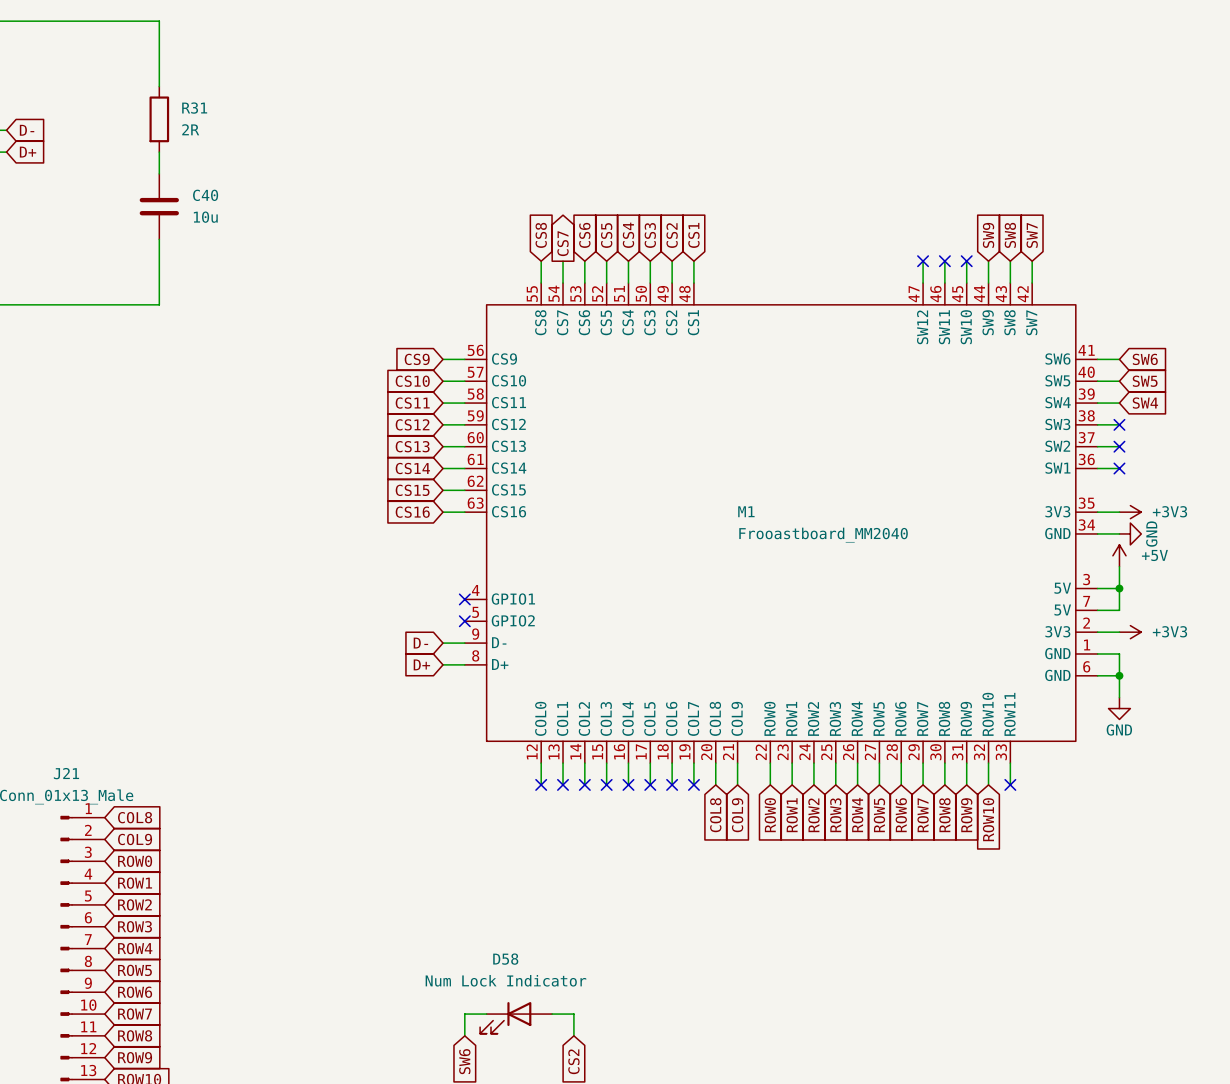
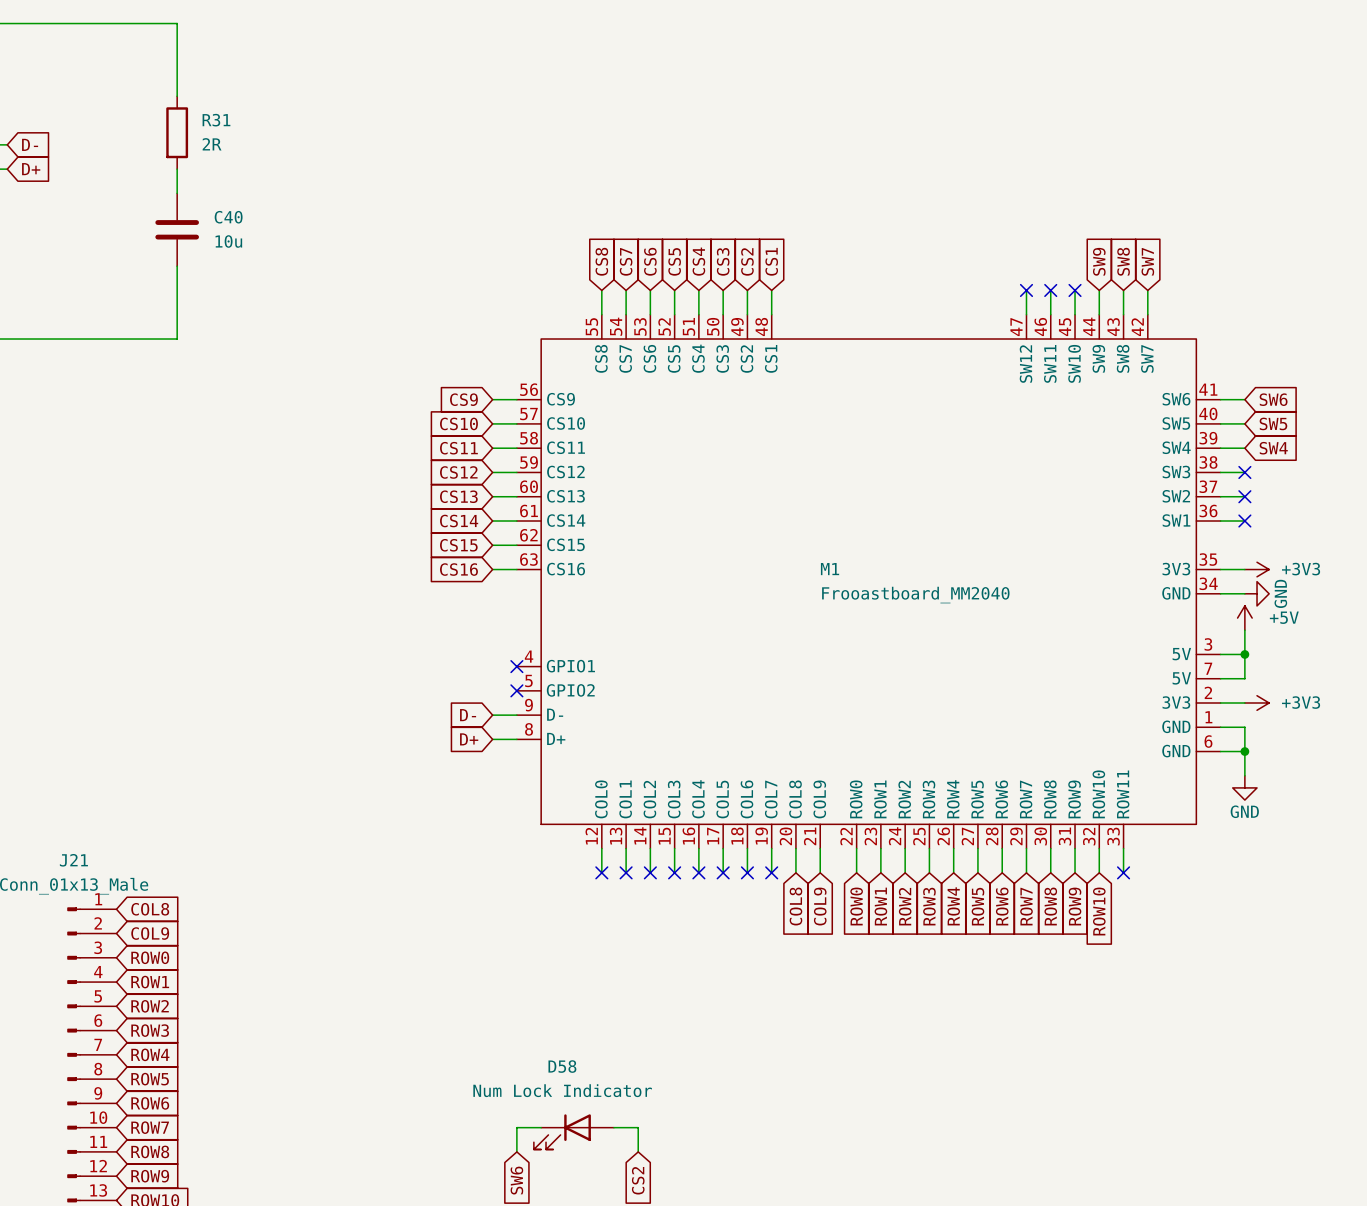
global label shape: output (563, 243) -> input (626, 261)

